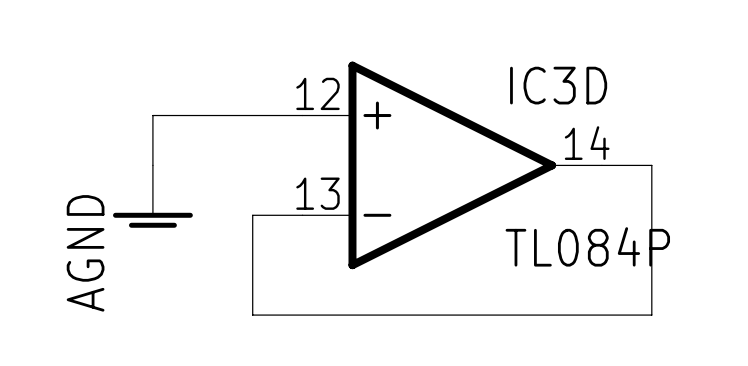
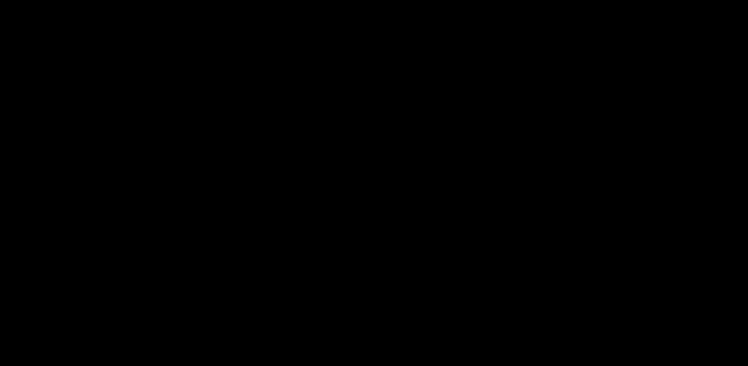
wire: (302, 115) (152, 115) (152, 165) -> none
IC3D: TL084P (452, 165) -> none
wire: (601, 165) (651, 165) (651, 315) (252, 315) (252, 215) (302, 215) -> none
power symbol: AGND (152, 196) -> none

